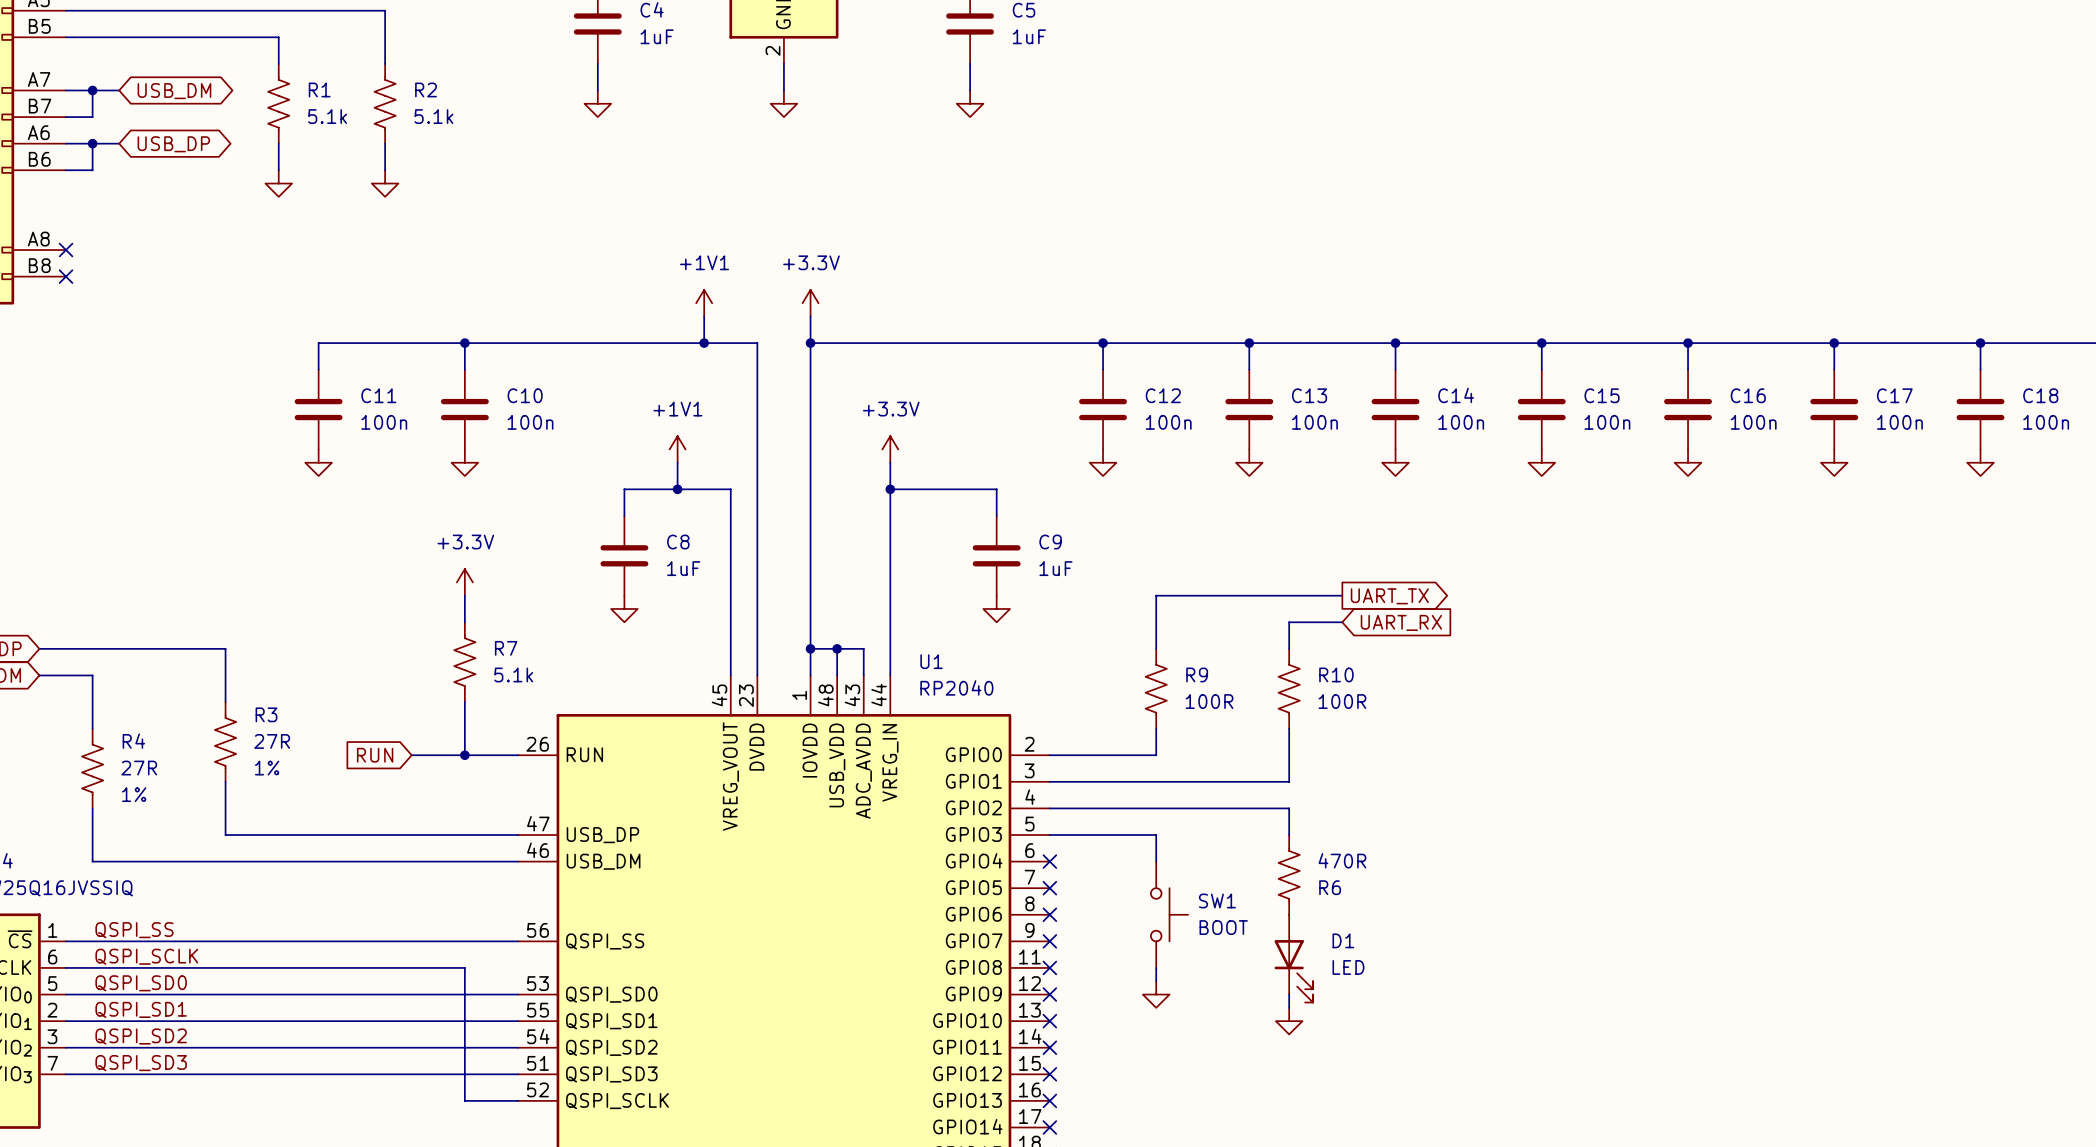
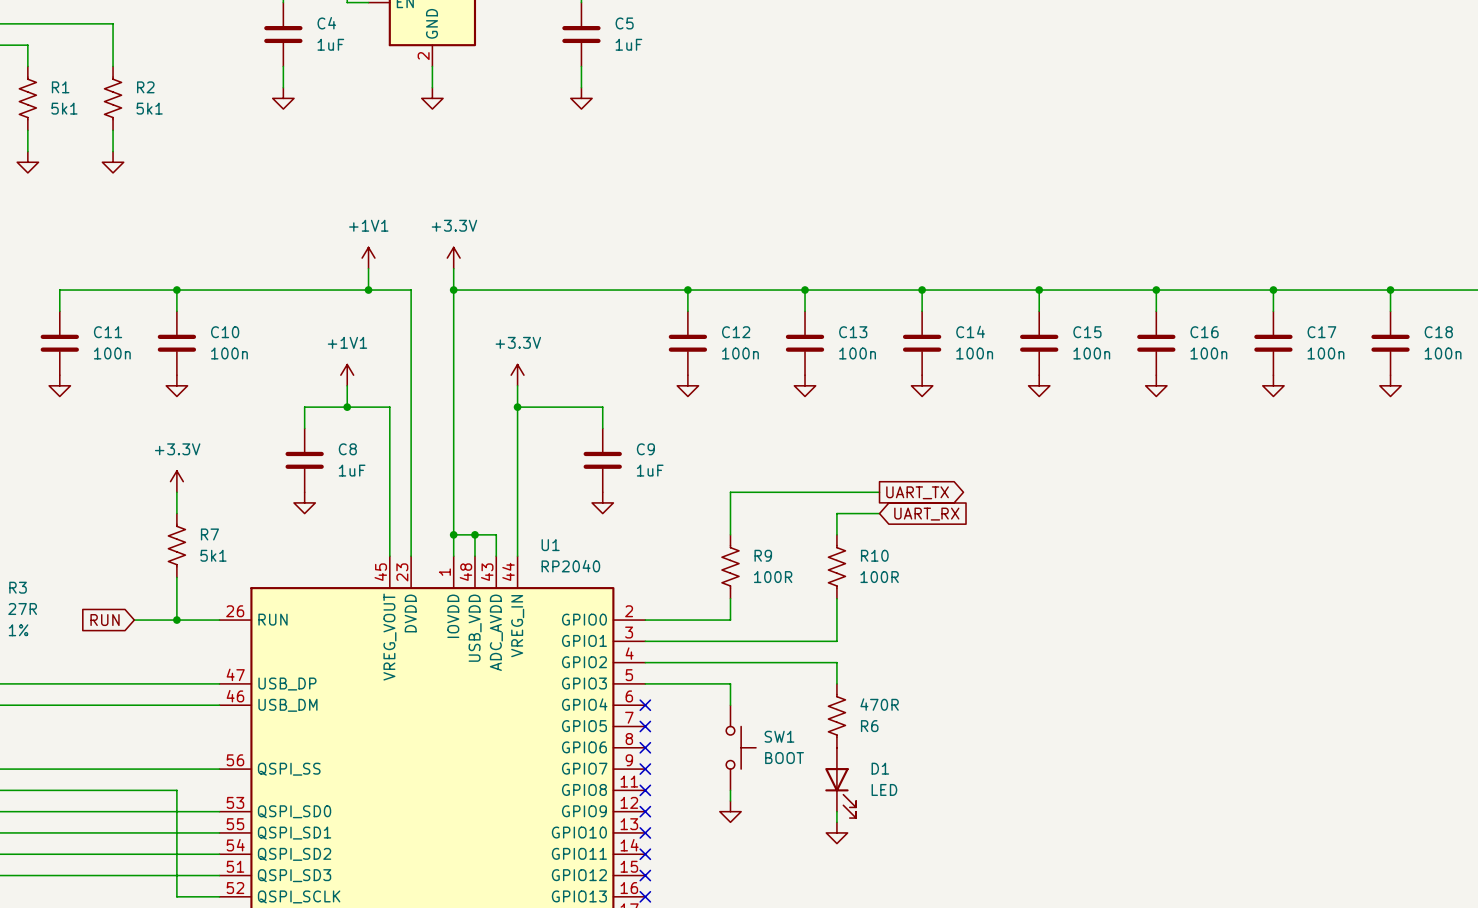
R1 value: 5.1k (327, 116) -> 5k1 (64, 108)
R2 value: 5.1k (433, 116) -> 5k1 (149, 108)
R7 value: 5.1k (513, 674) -> 5k1 (213, 555)

